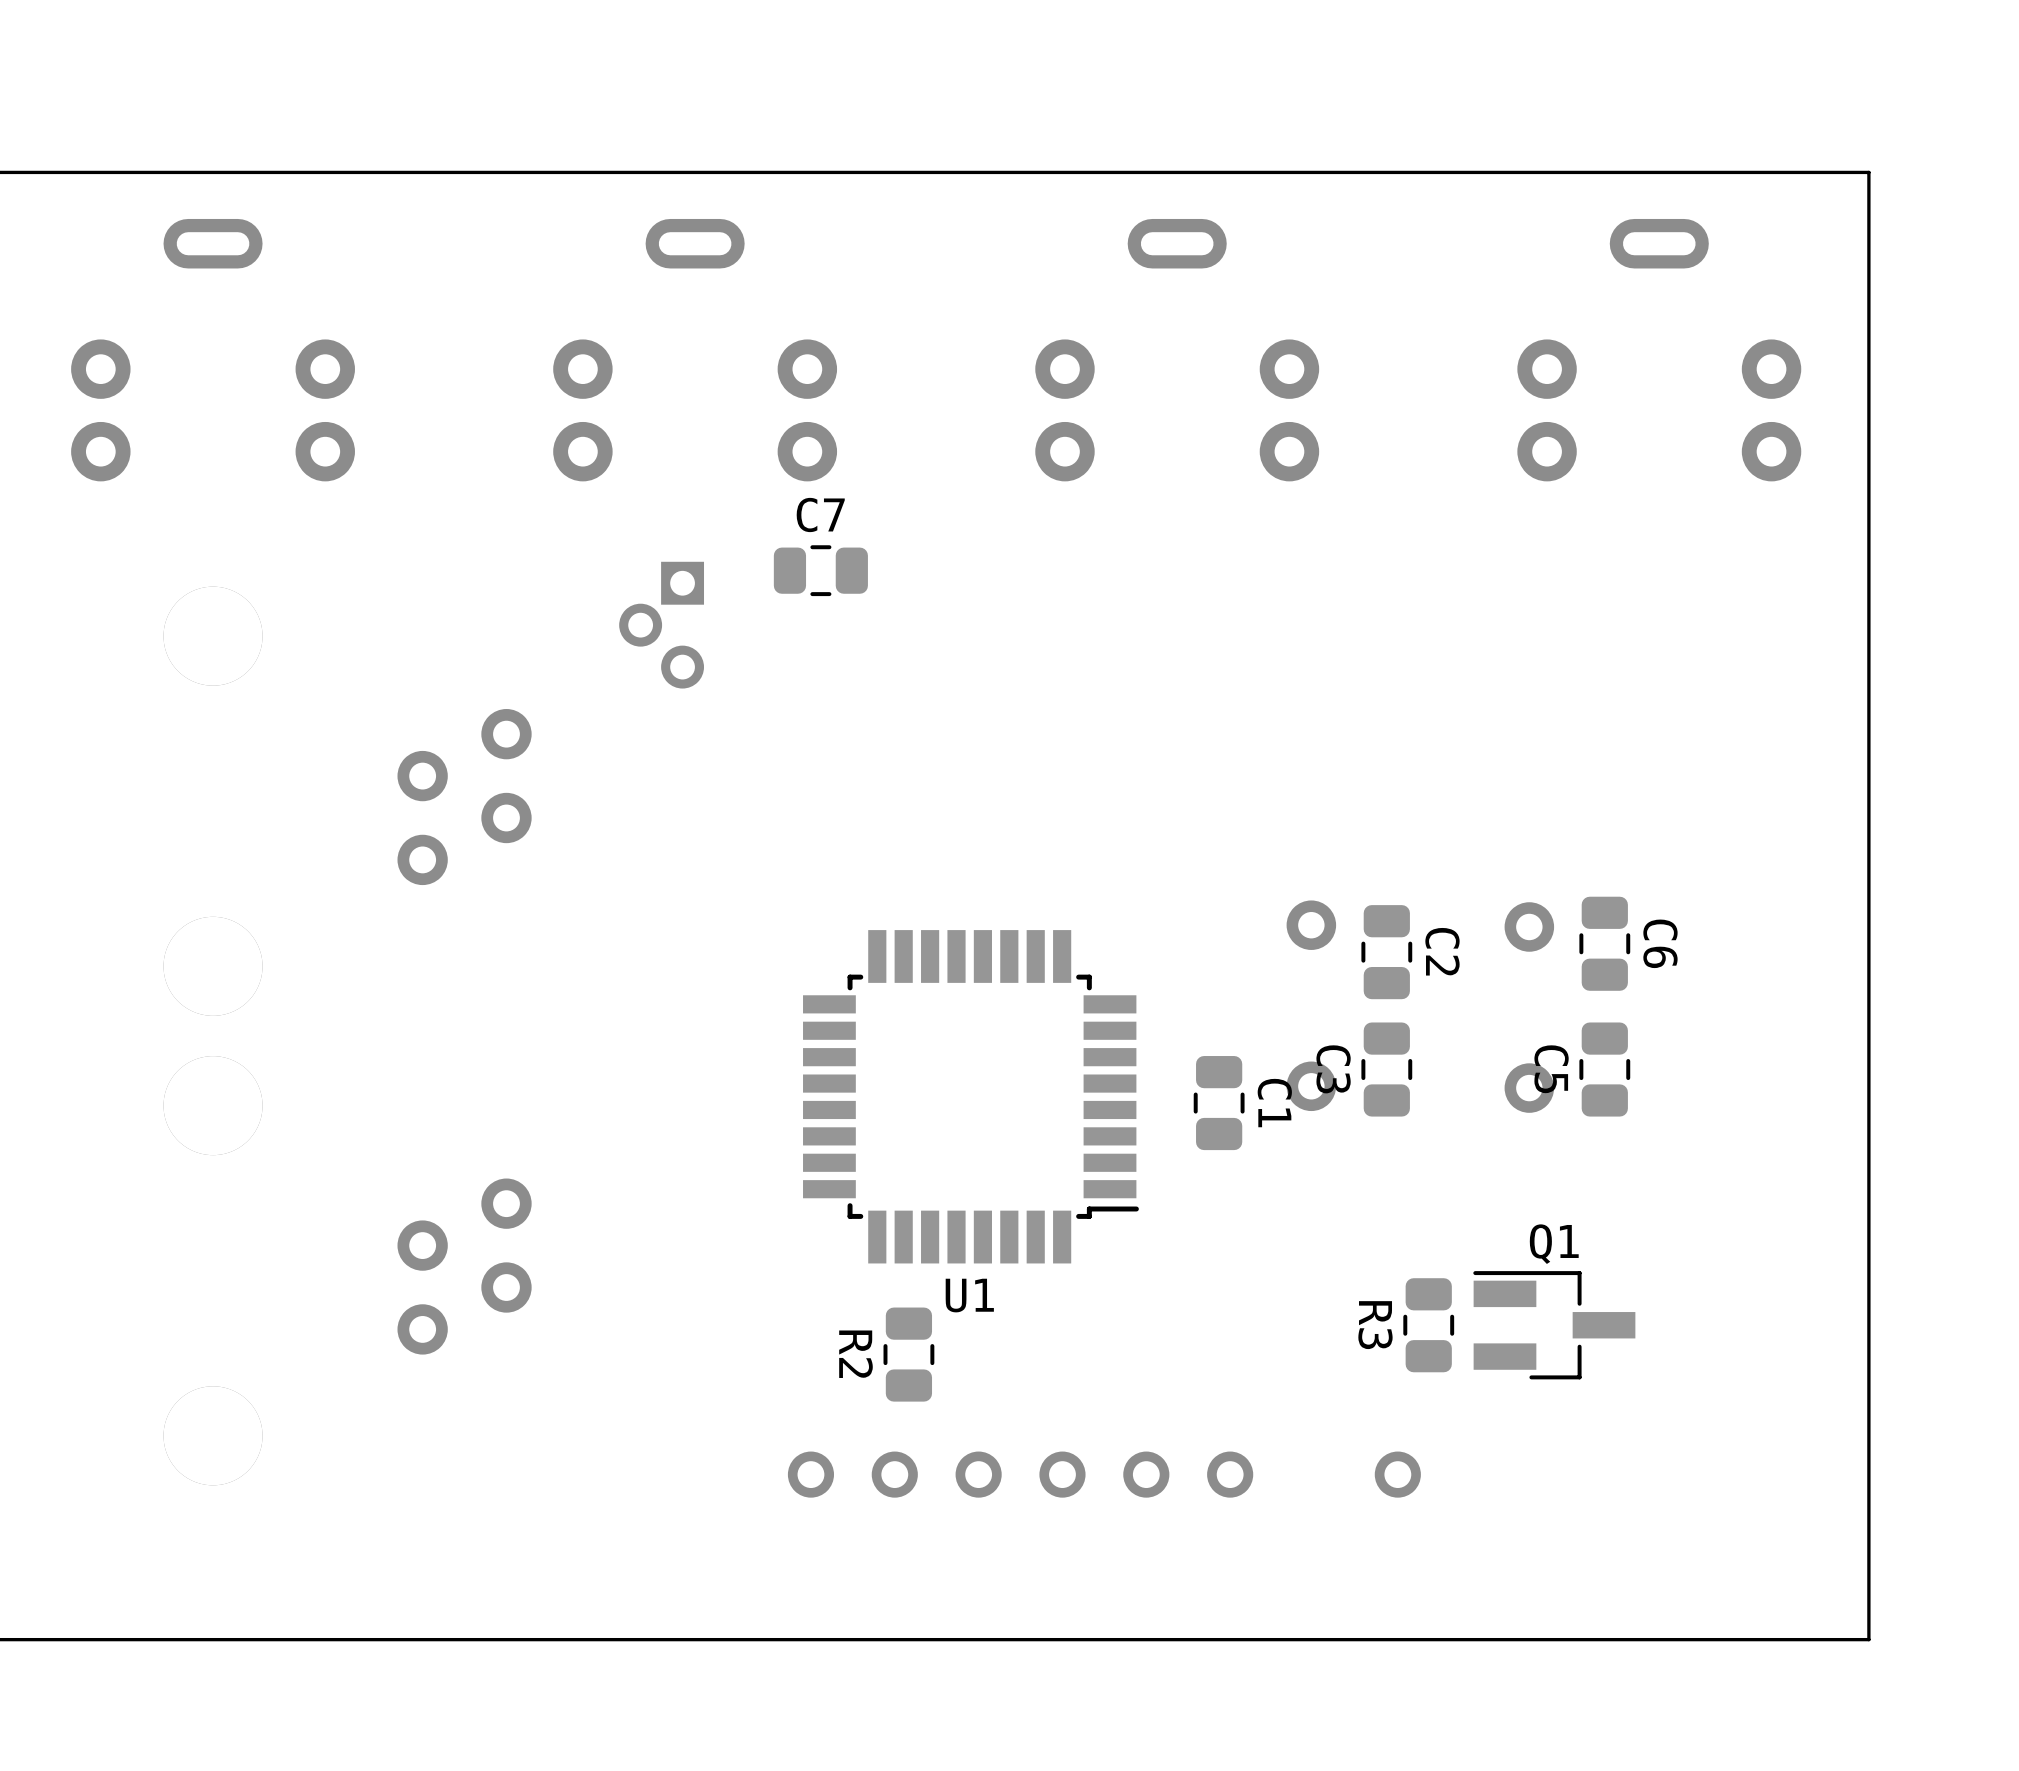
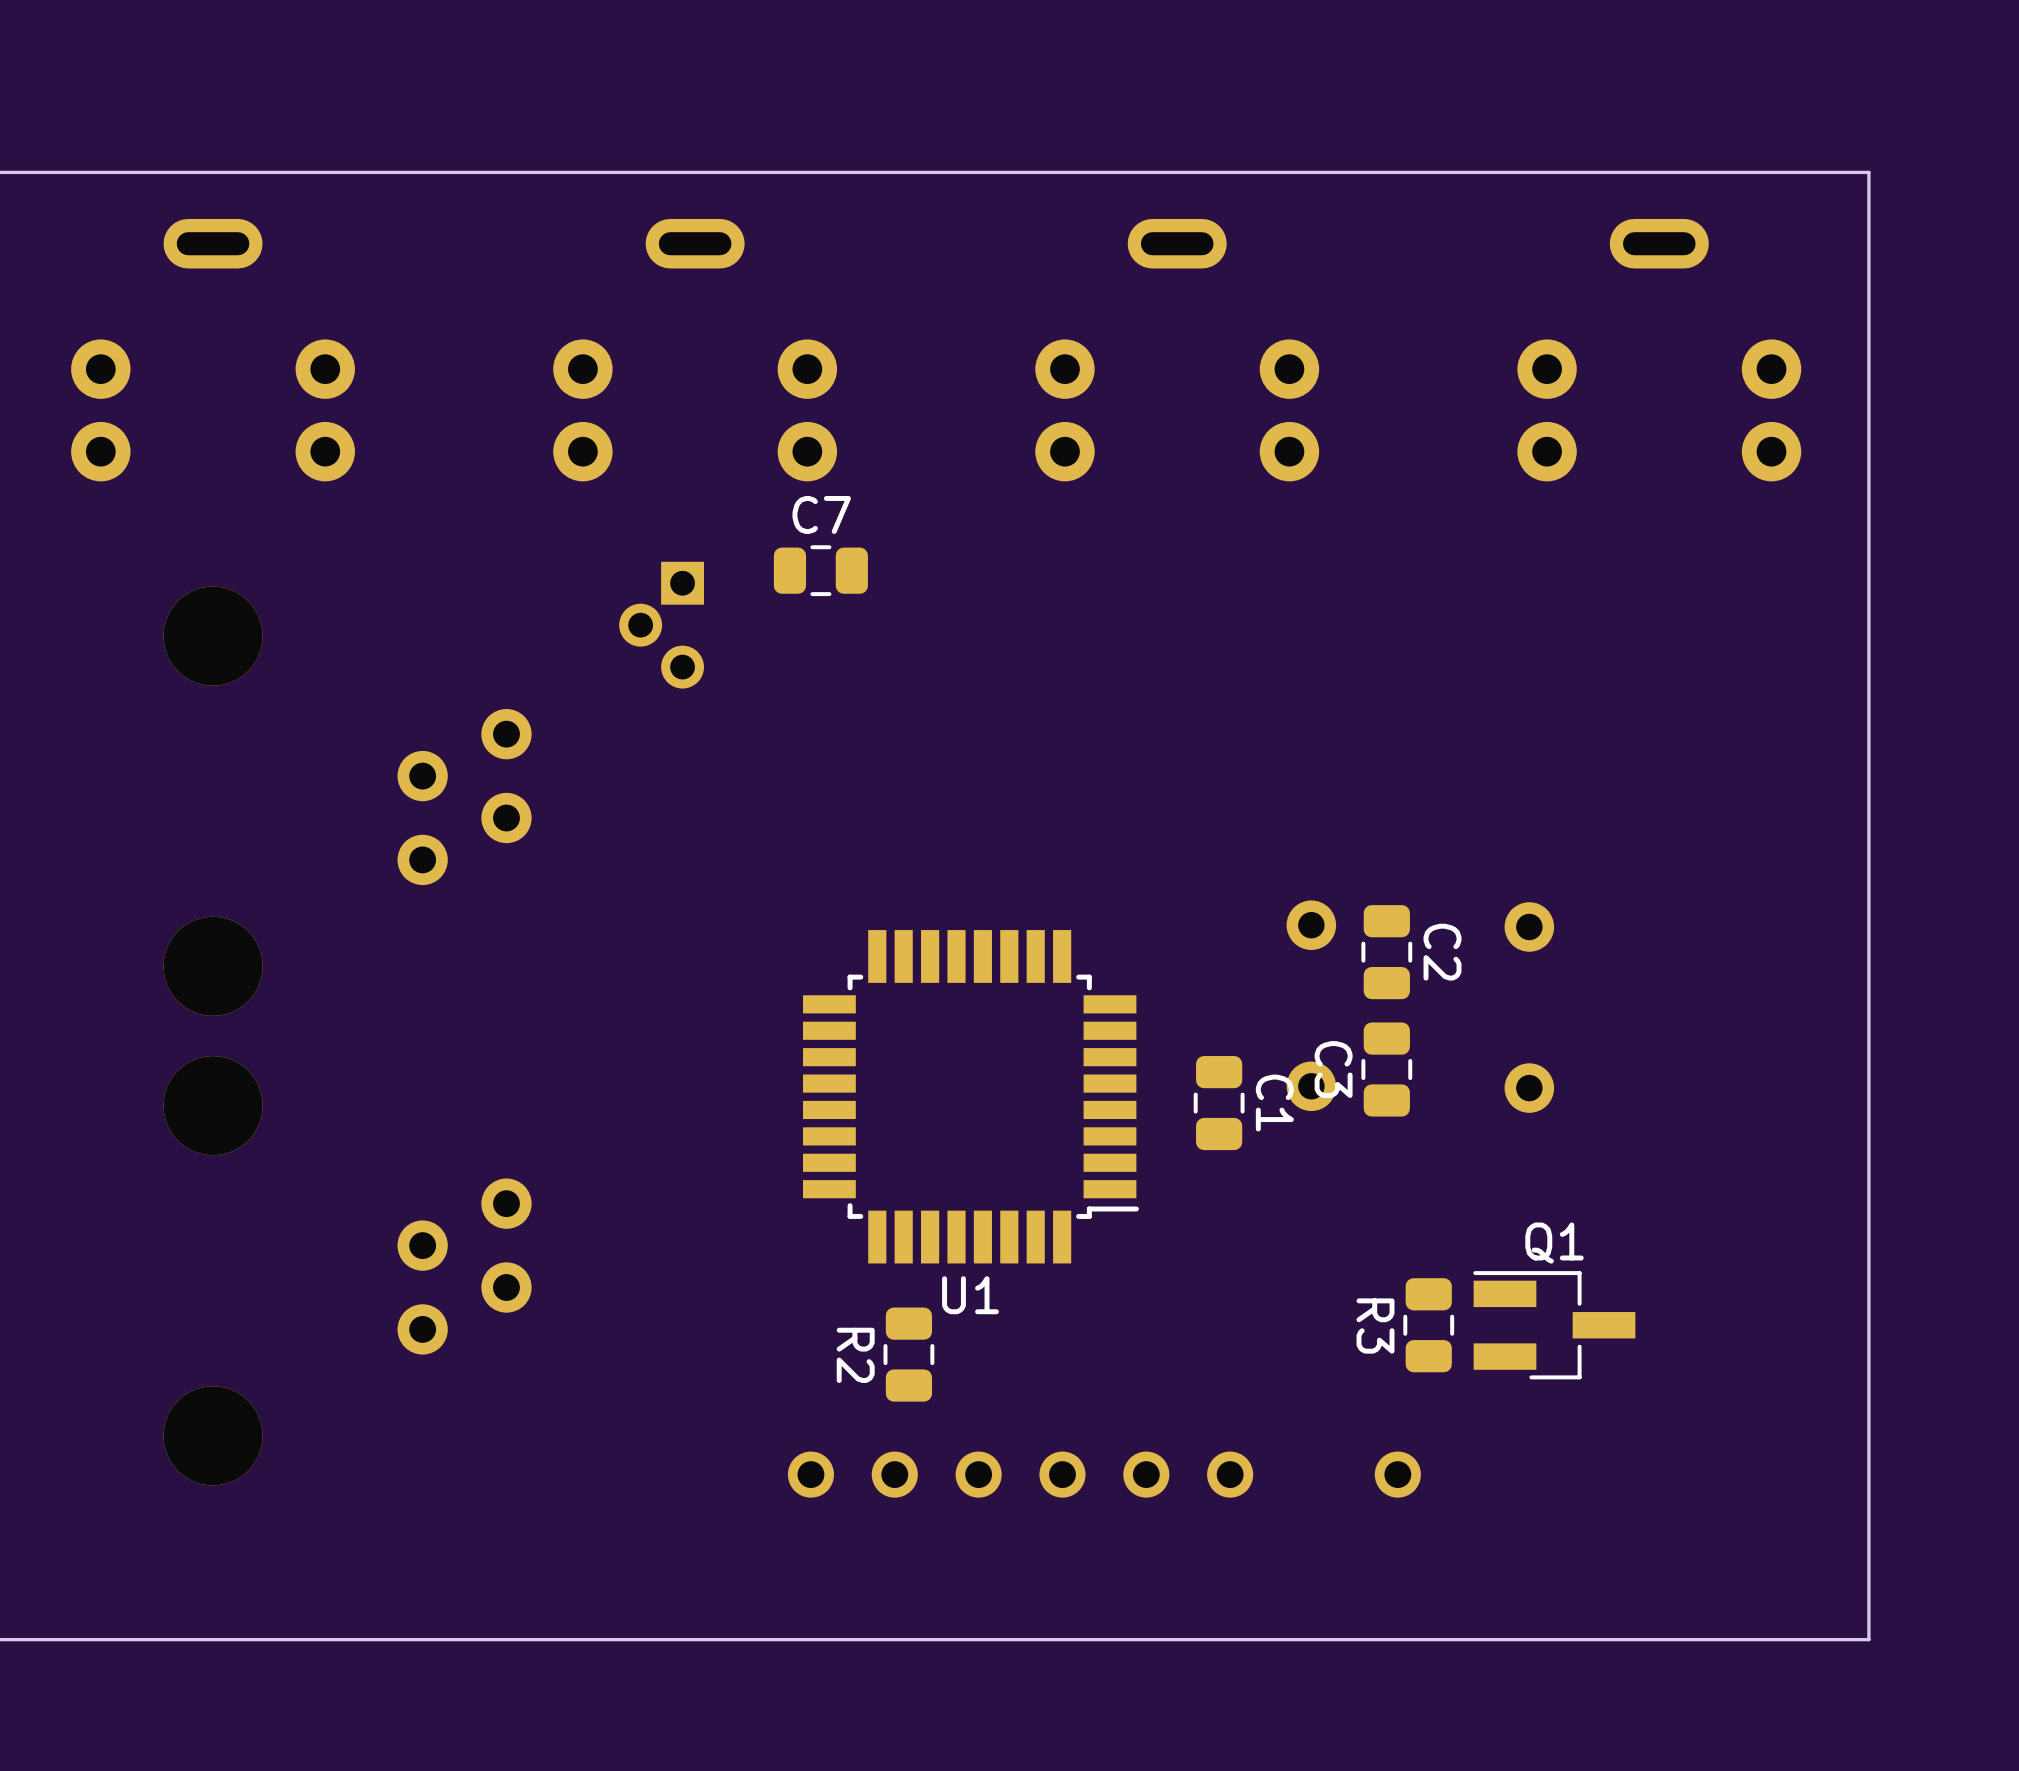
C6: (1604, 943) -> none
C5: (1604, 1069) -> none

